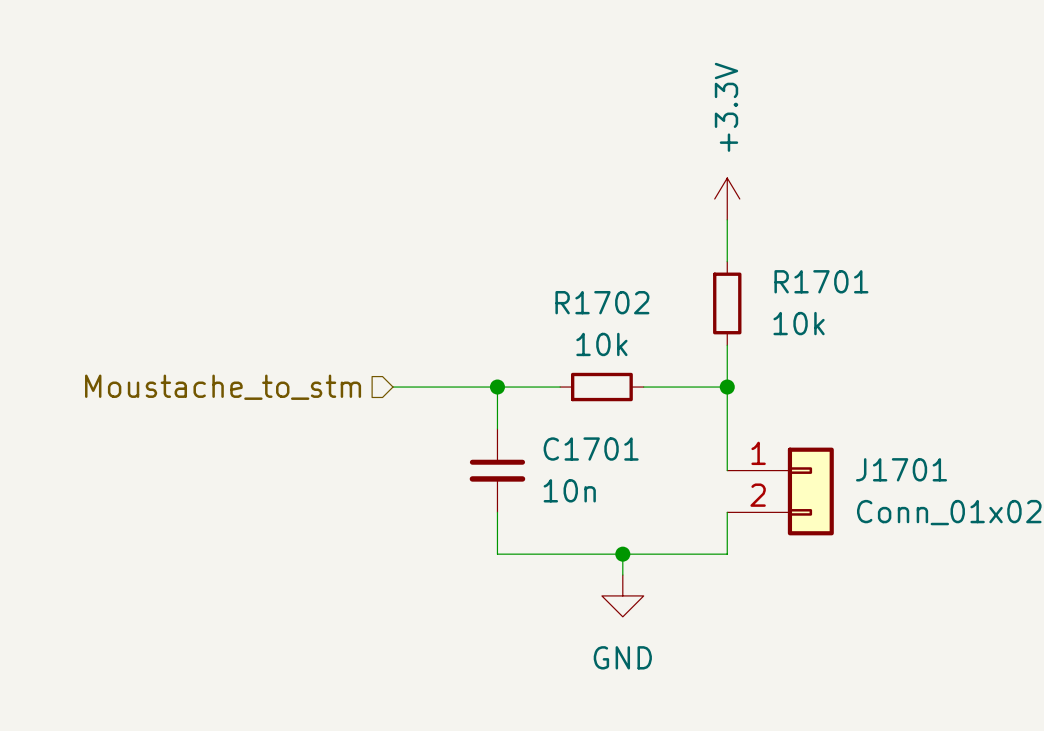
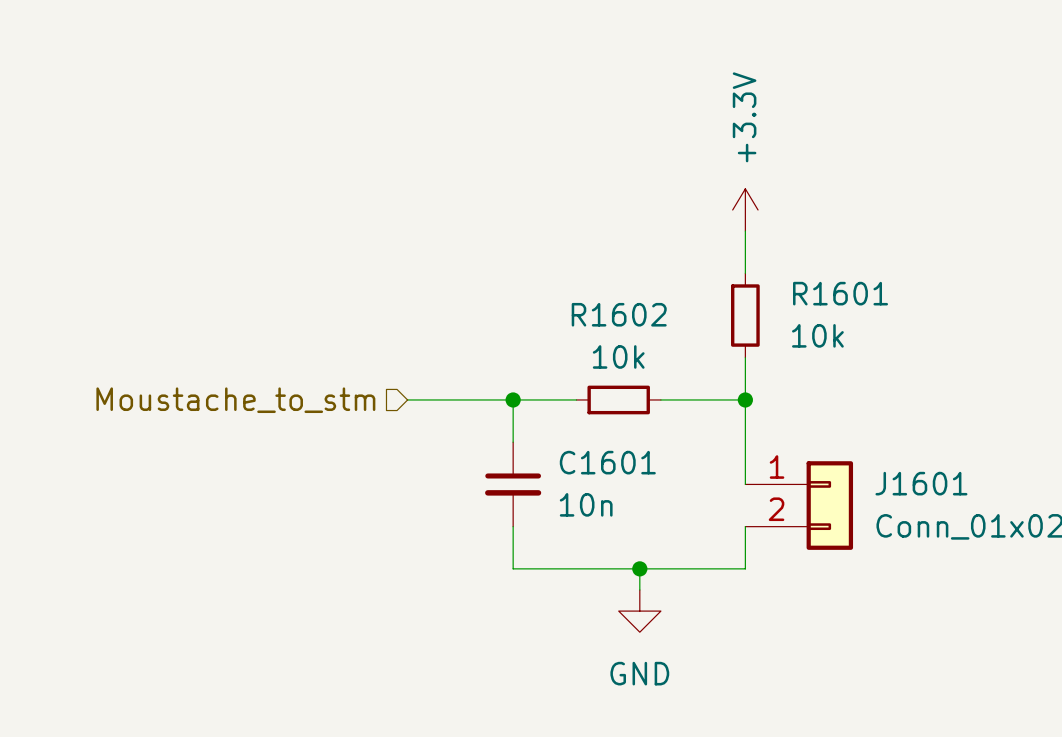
R1701 name: R1701 (821, 281) -> R1601 (840, 293)
R1702 name: R1702 (602, 302) -> R1602 (619, 314)
C1701 name: C1701 (591, 449) -> C1601 (607, 462)
J1701 name: J1701 (901, 469) -> J1601 (921, 483)

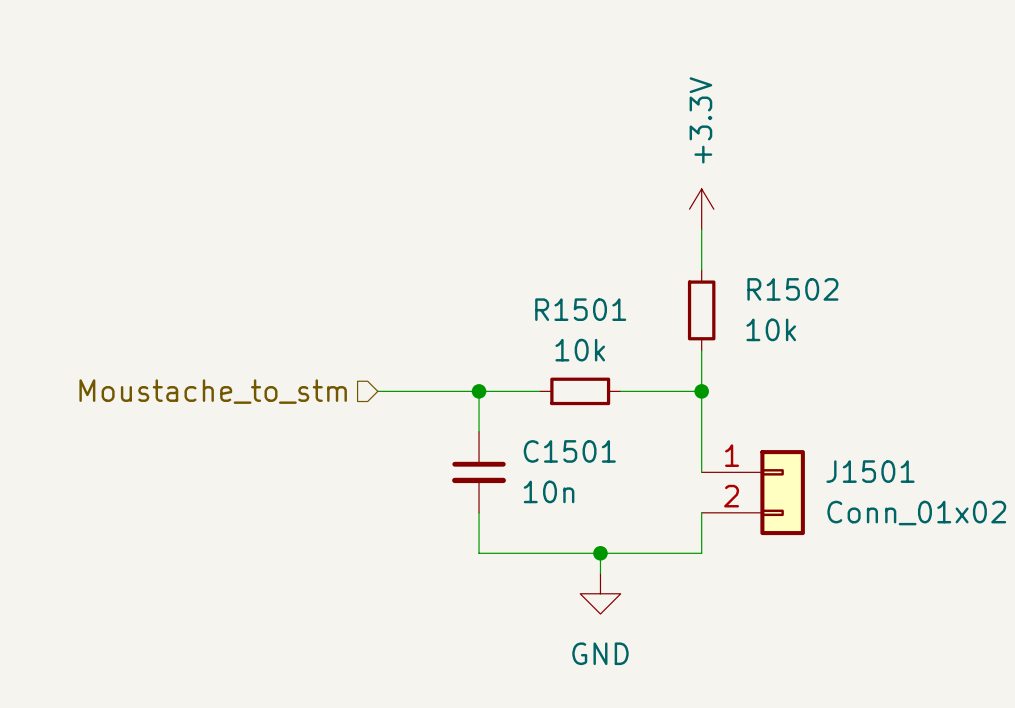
R1601 name: R1601 (840, 293) -> R1502 (792, 289)
R1602 name: R1602 (619, 314) -> R1501 (580, 309)
C1601 name: C1601 (607, 462) -> C1501 (569, 451)
J1601 name: J1601 (921, 483) -> J1501 (870, 471)

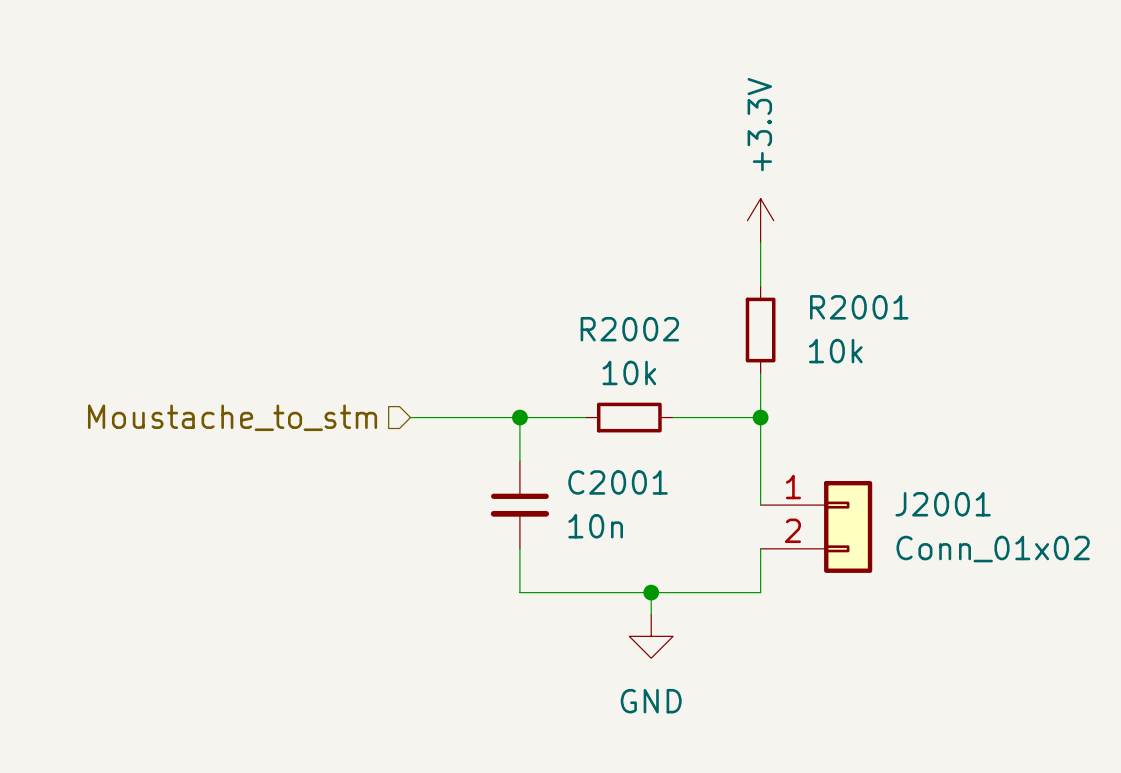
R1502 name: R1502 (792, 289) -> R2001 (859, 307)
R1501 name: R1501 (580, 309) -> R2002 (629, 329)
C1501 name: C1501 (569, 451) -> C2001 (618, 482)
J1501 name: J1501 (870, 471) -> J2001 (943, 504)

